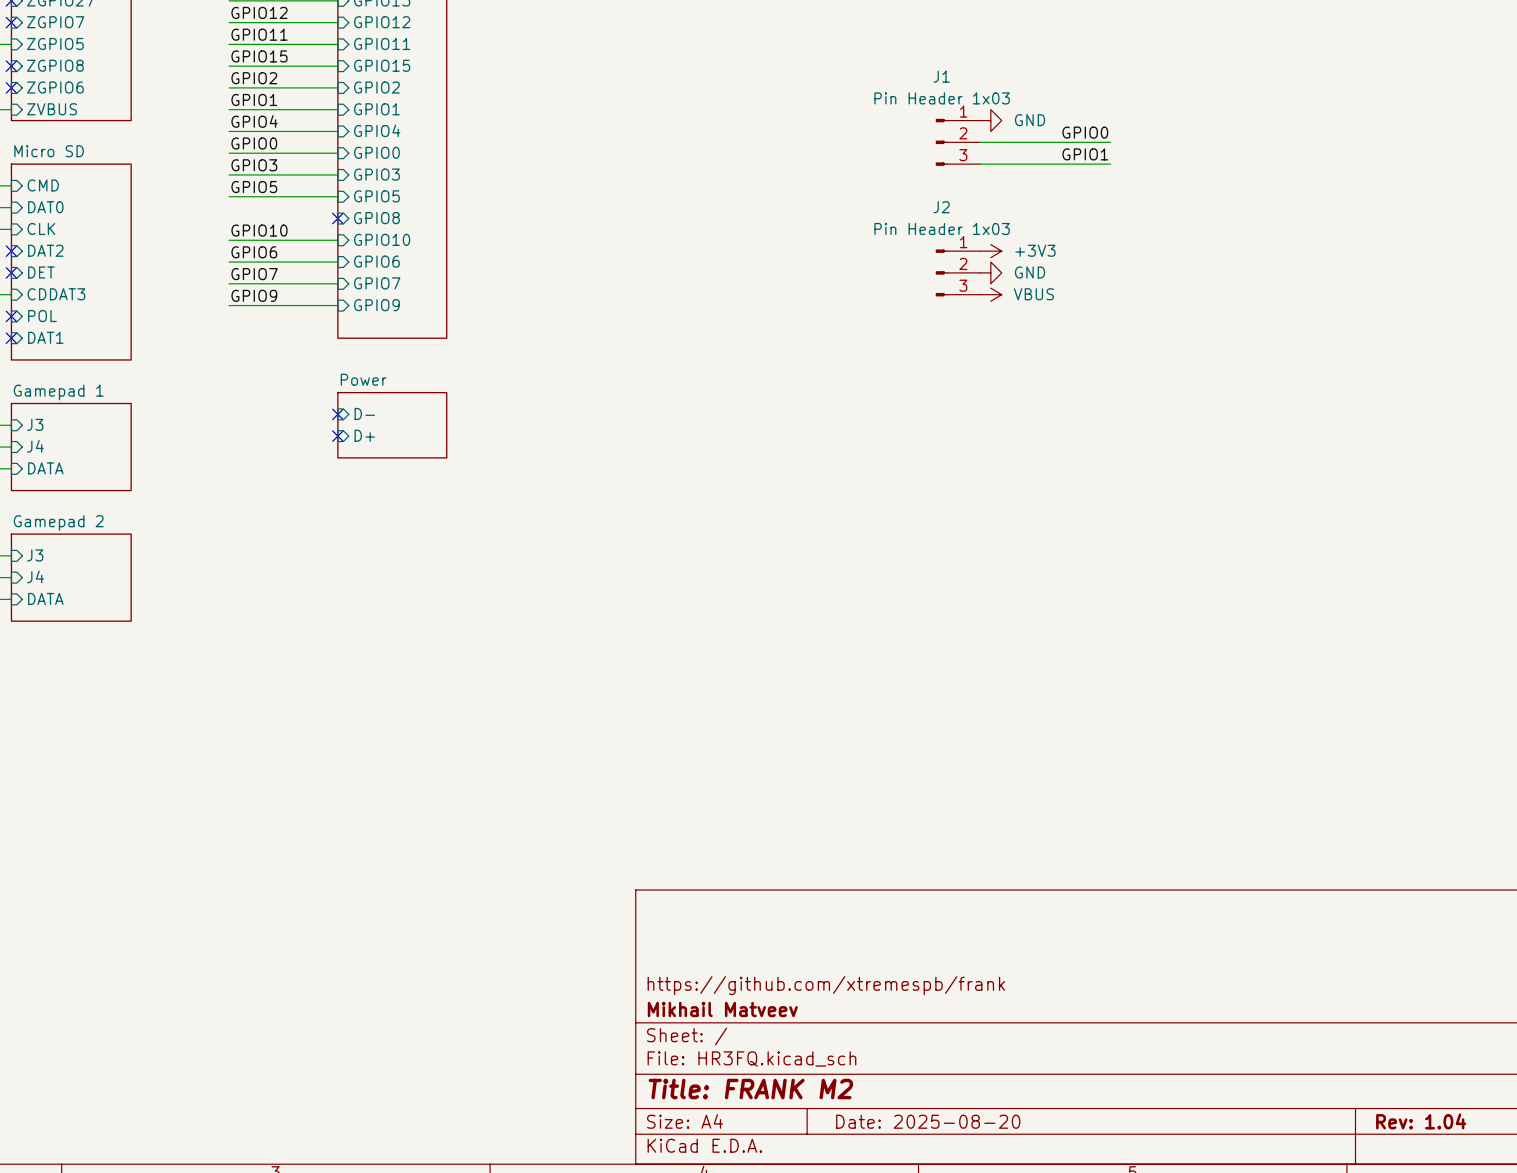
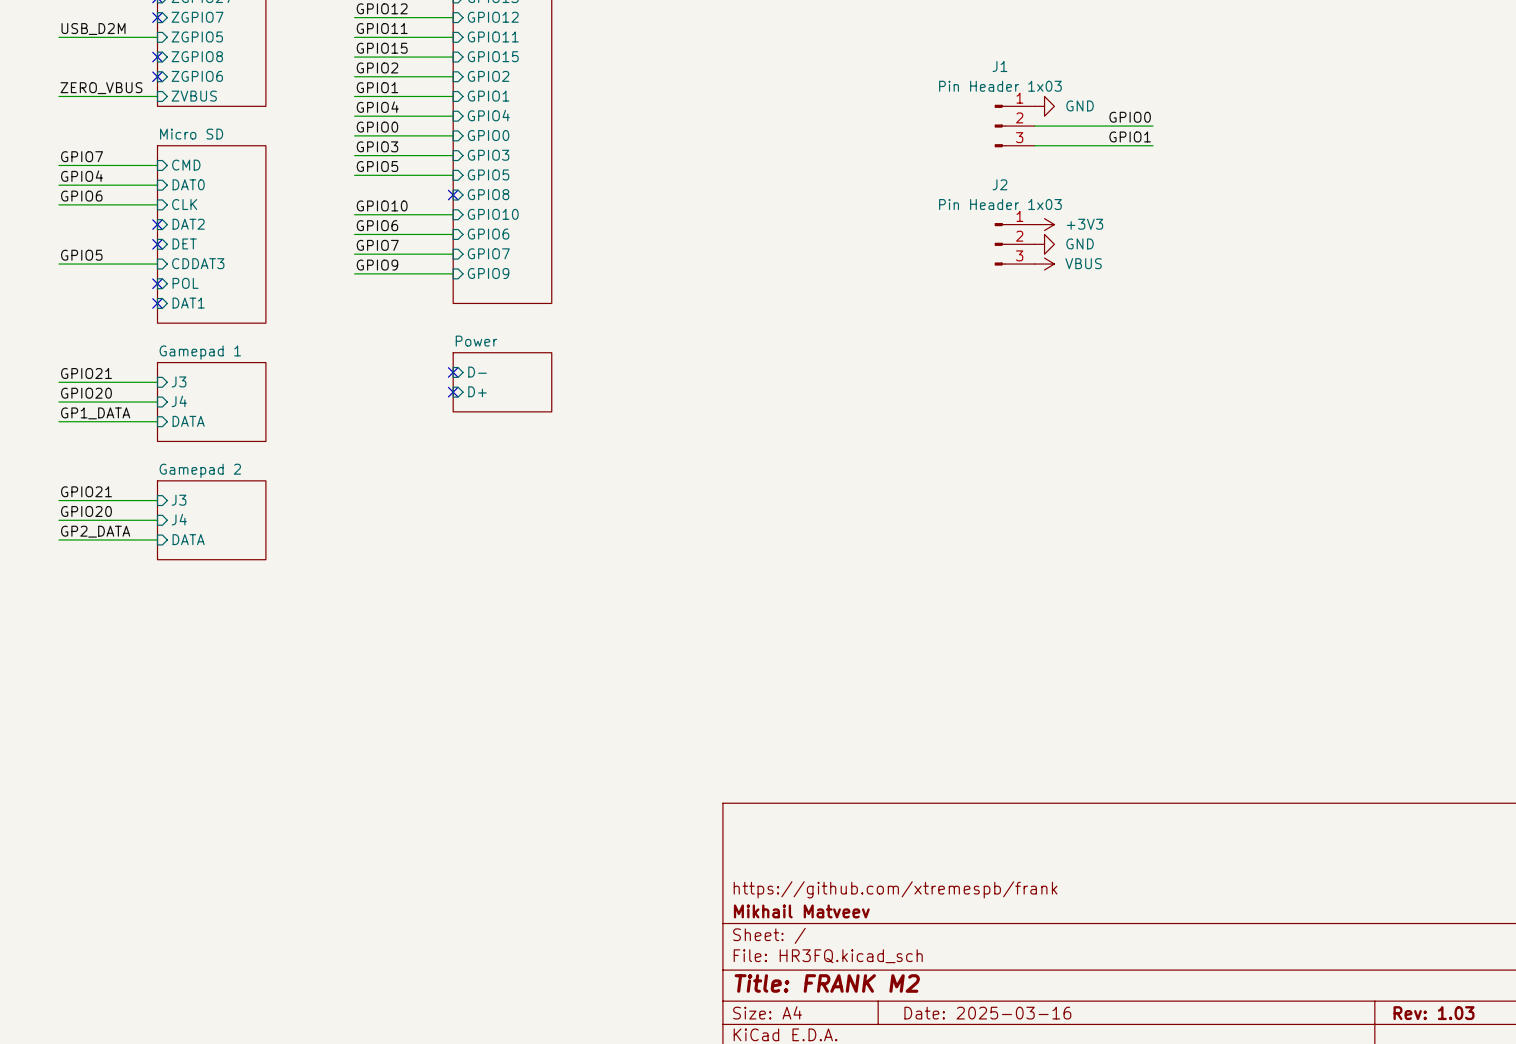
title block: Date: 2025-08-20 (928, 1121) -> Date: 2025-03-16 (987, 1013)
title block: Rev: 1.04 (1421, 1121) -> Rev: 1.03 (1434, 1013)

